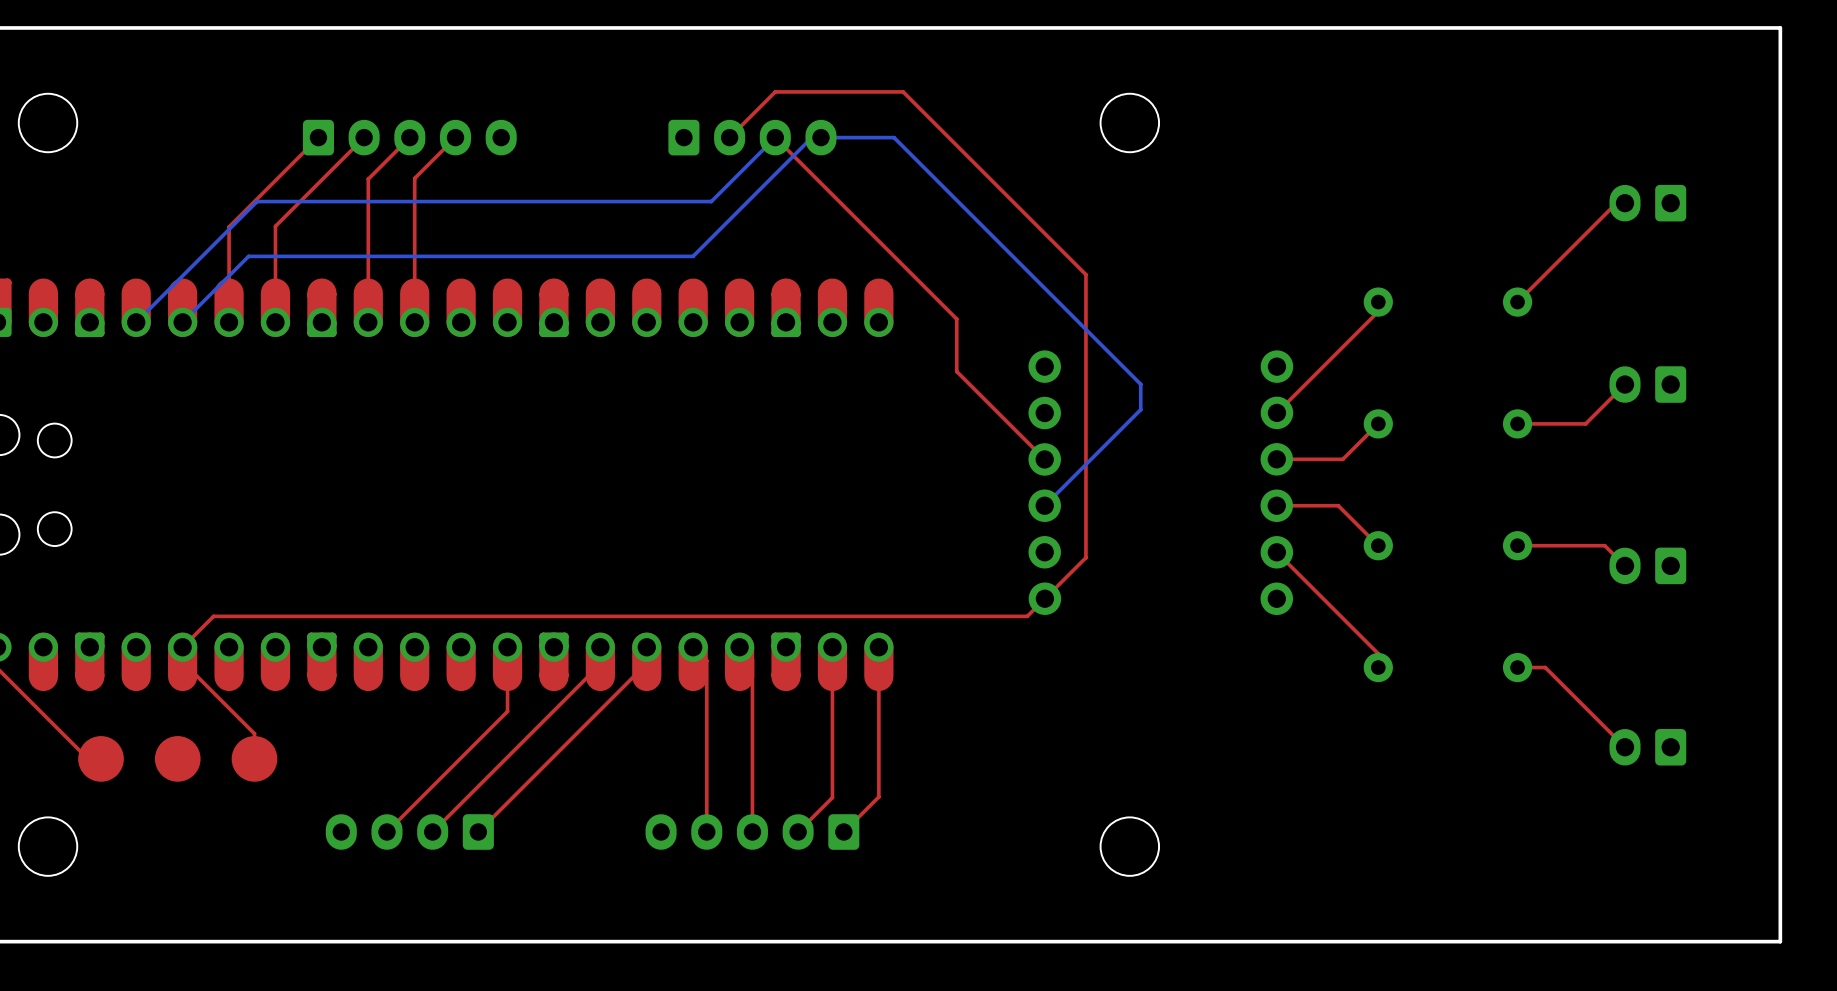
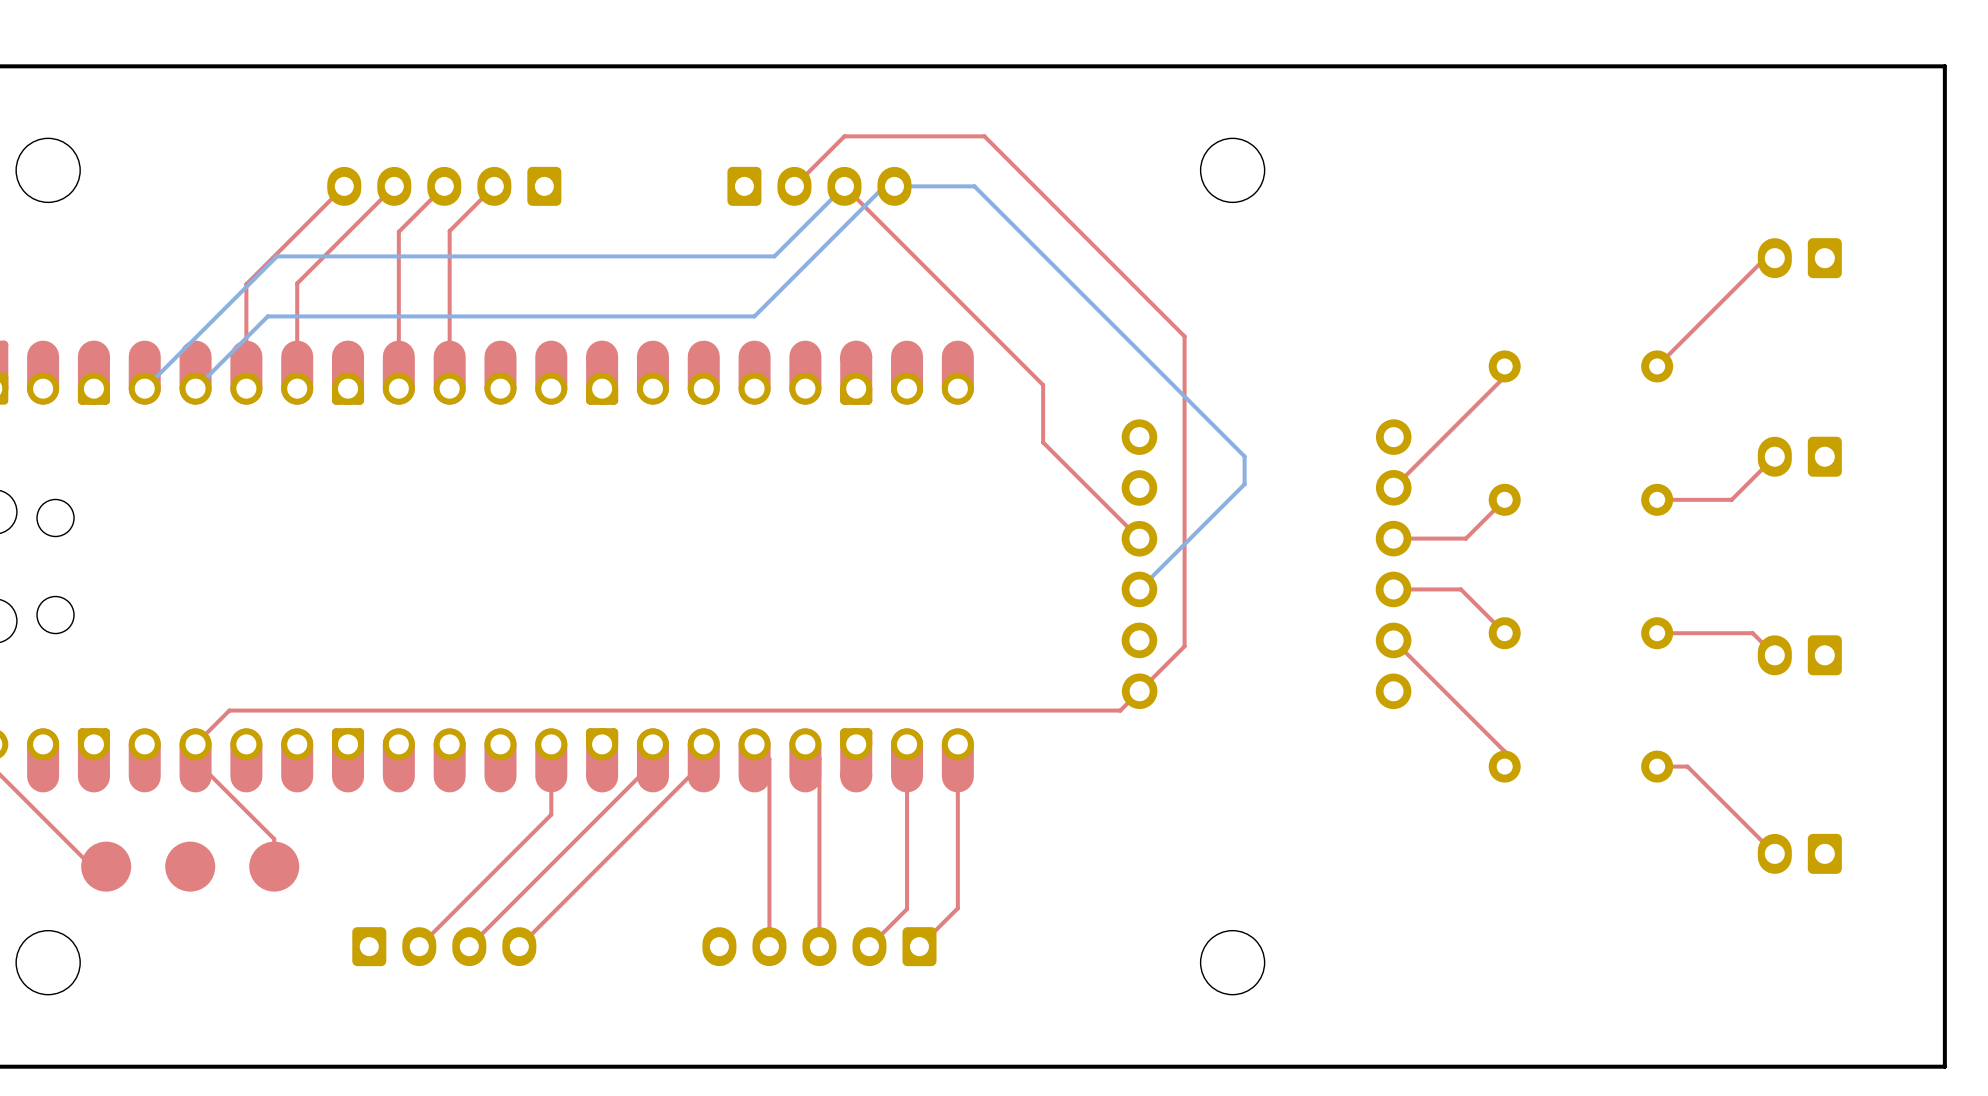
part rotation: 0° (409, 137) -> 180° (444, 186)
part rotation: 0° (409, 832) -> 180° (444, 946)

